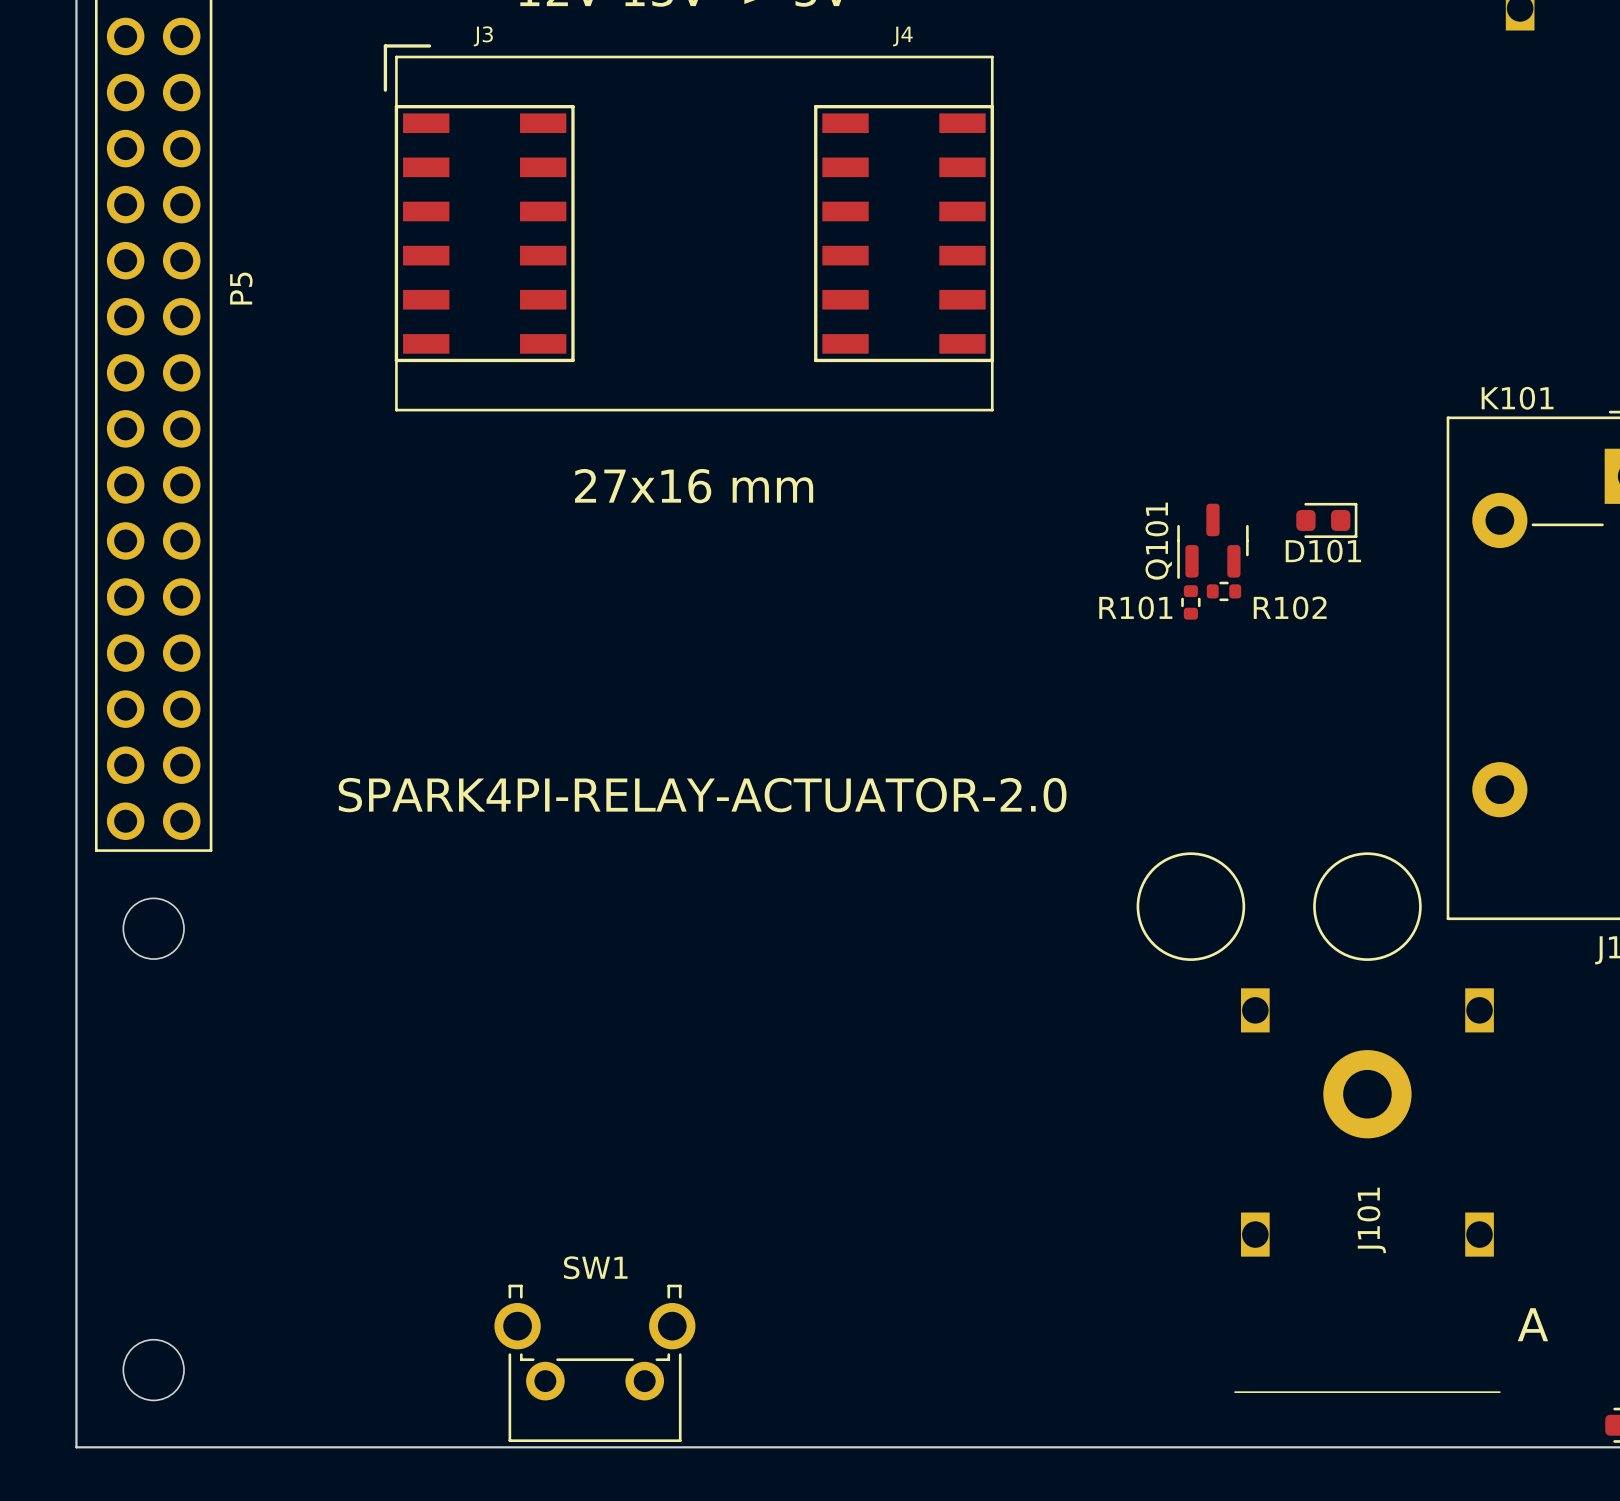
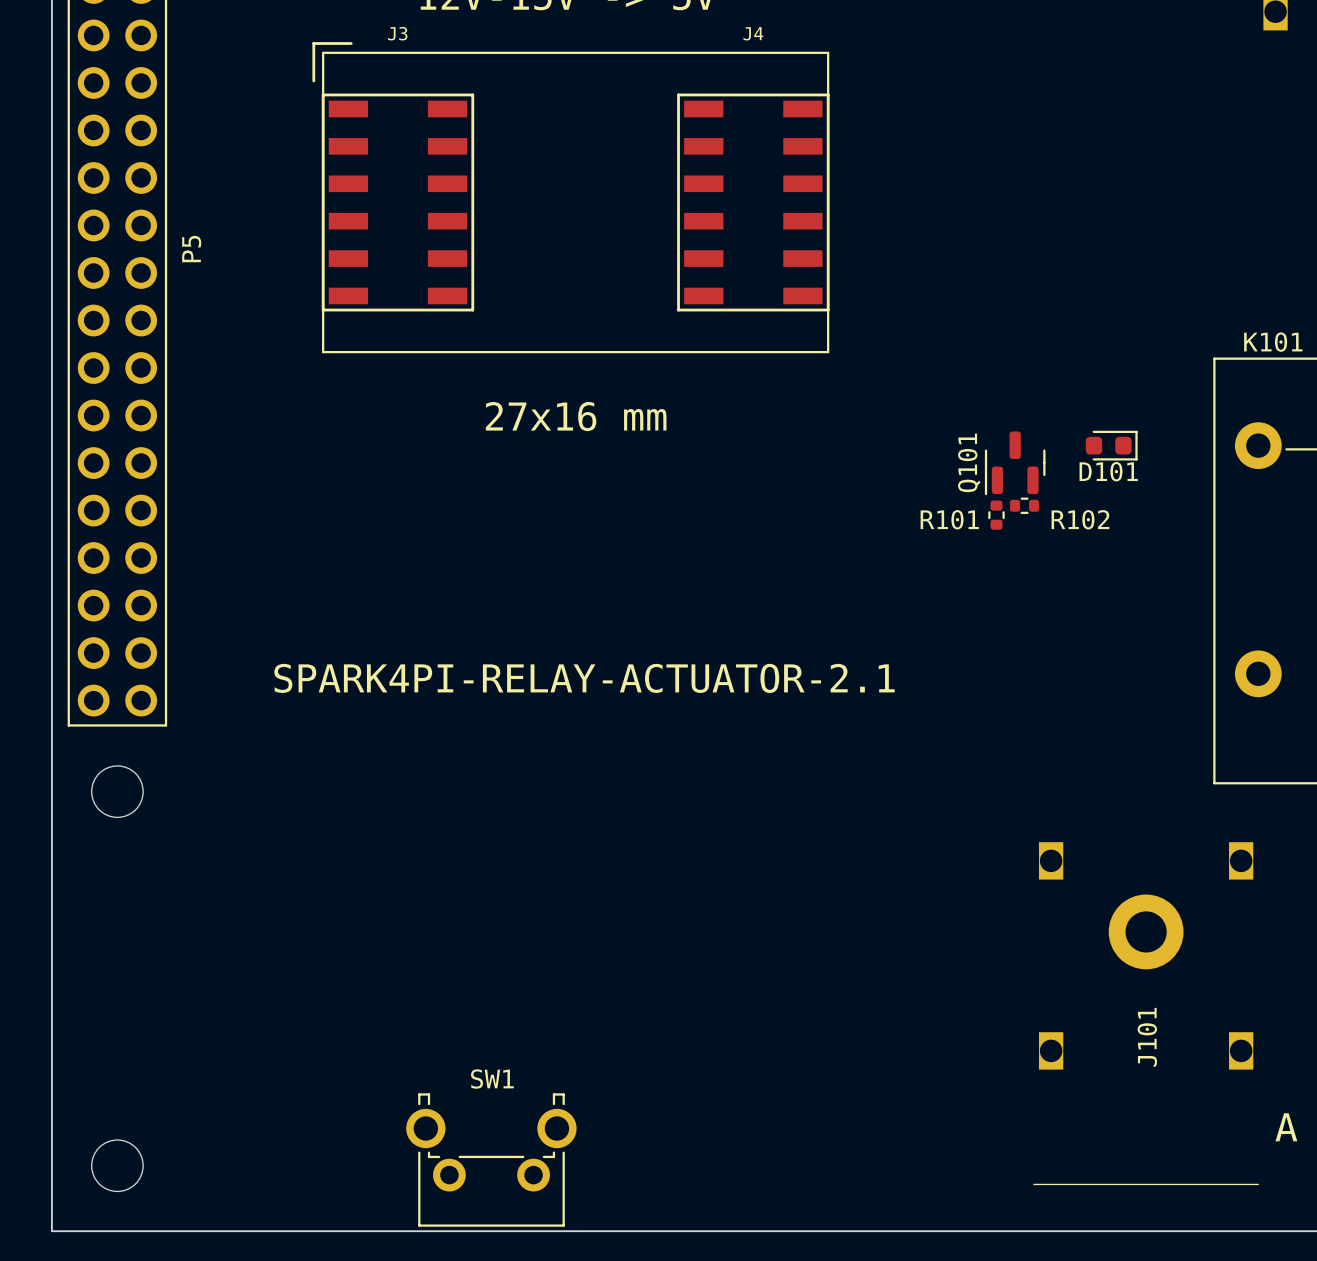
text: SPARK4PI-RELAY-ACTUATOR-2.0 (702, 795) -> SPARK4PI-RELAY-ACTUATOR-2.1 (584, 678)
drawing: [1136, 852, 1246, 961] -> none
drawing: [1313, 852, 1422, 961] -> none

